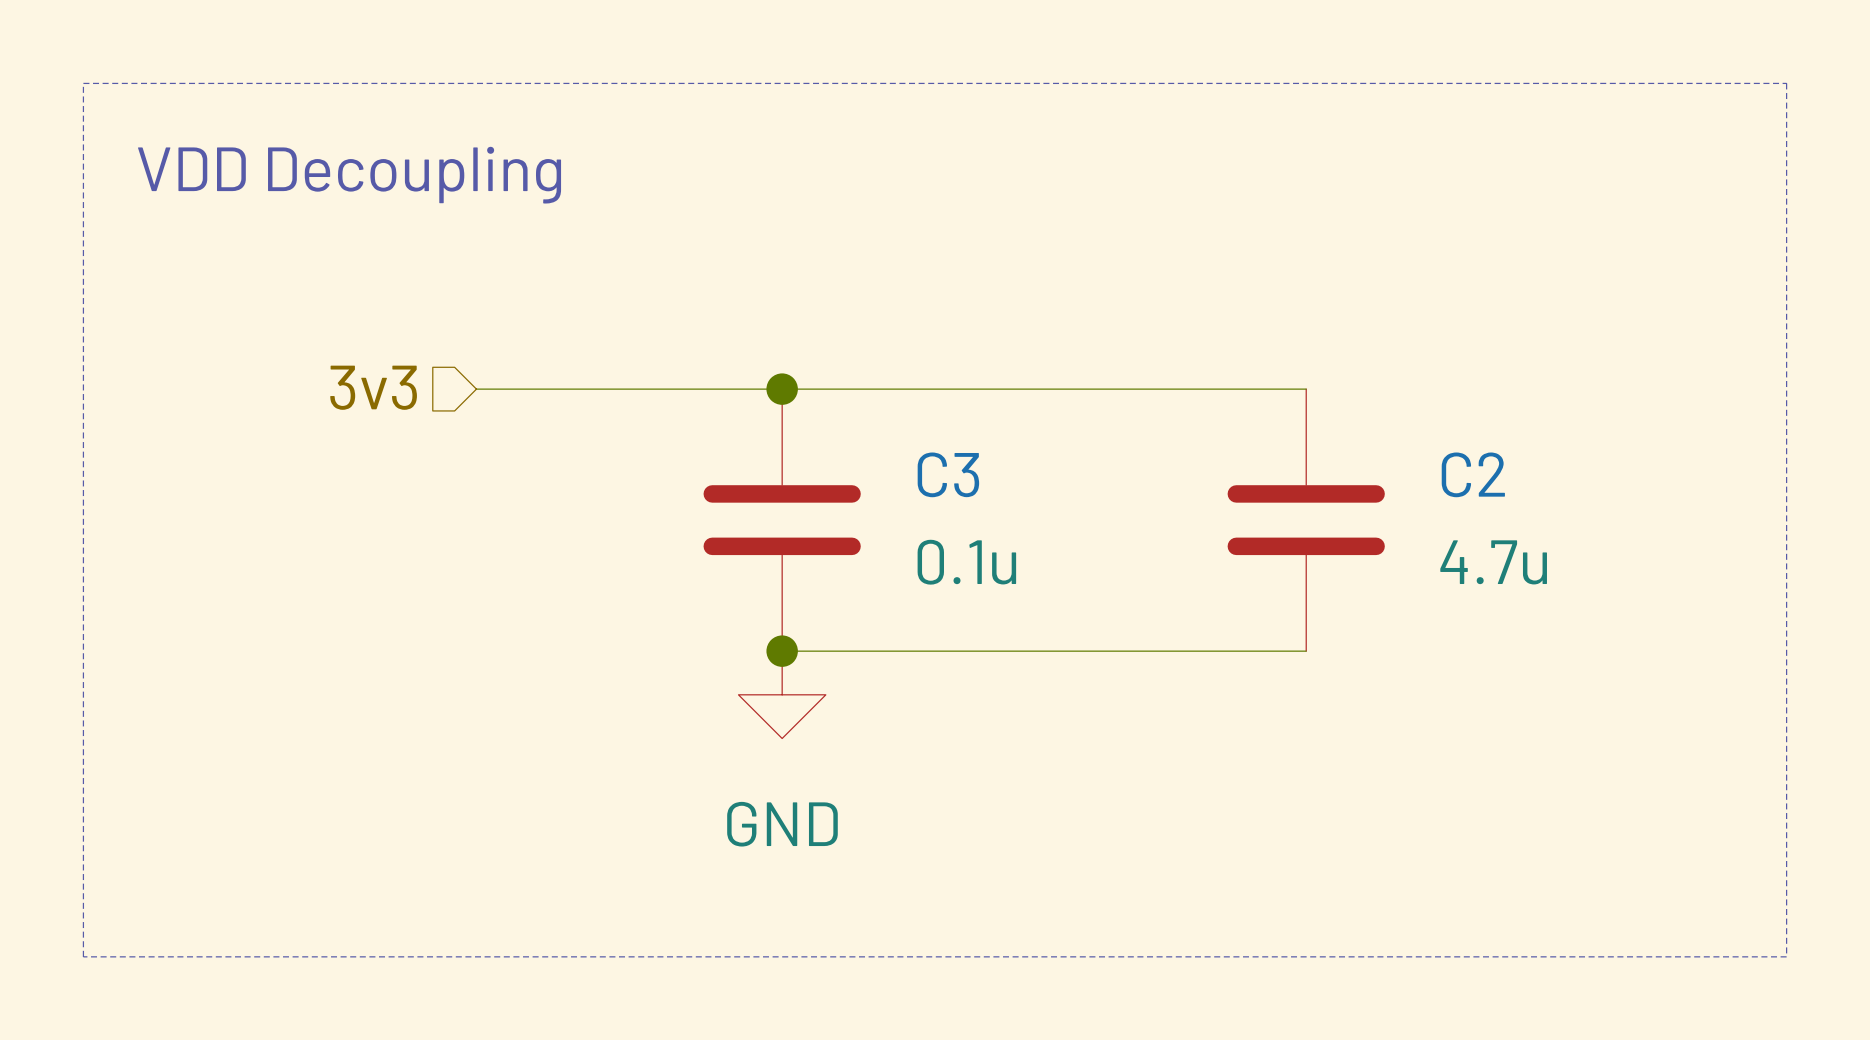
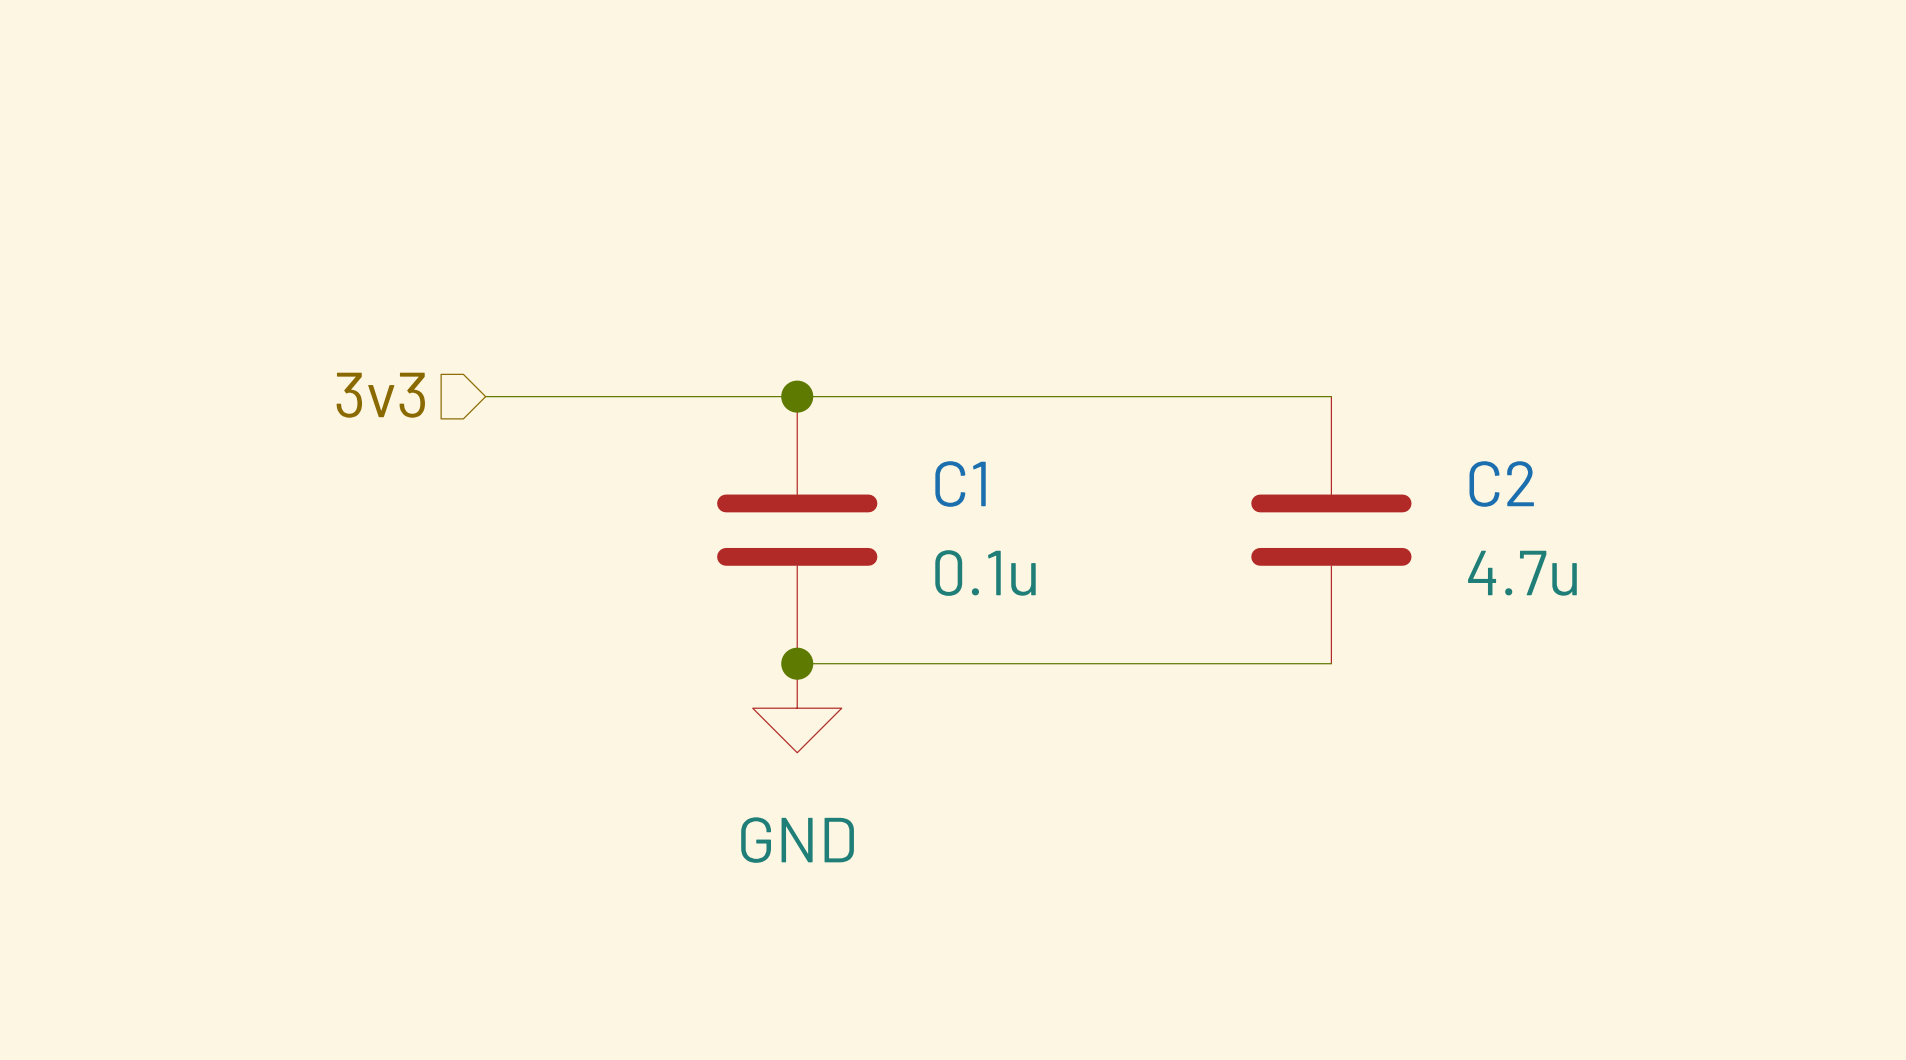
line: (83, 83) (1786, 83) (1786, 956) (83, 956) (83, 83) -> none
text: VDD Decoupling (349, 175) -> none
C3 name: C3 (948, 474) -> C1 (960, 484)

